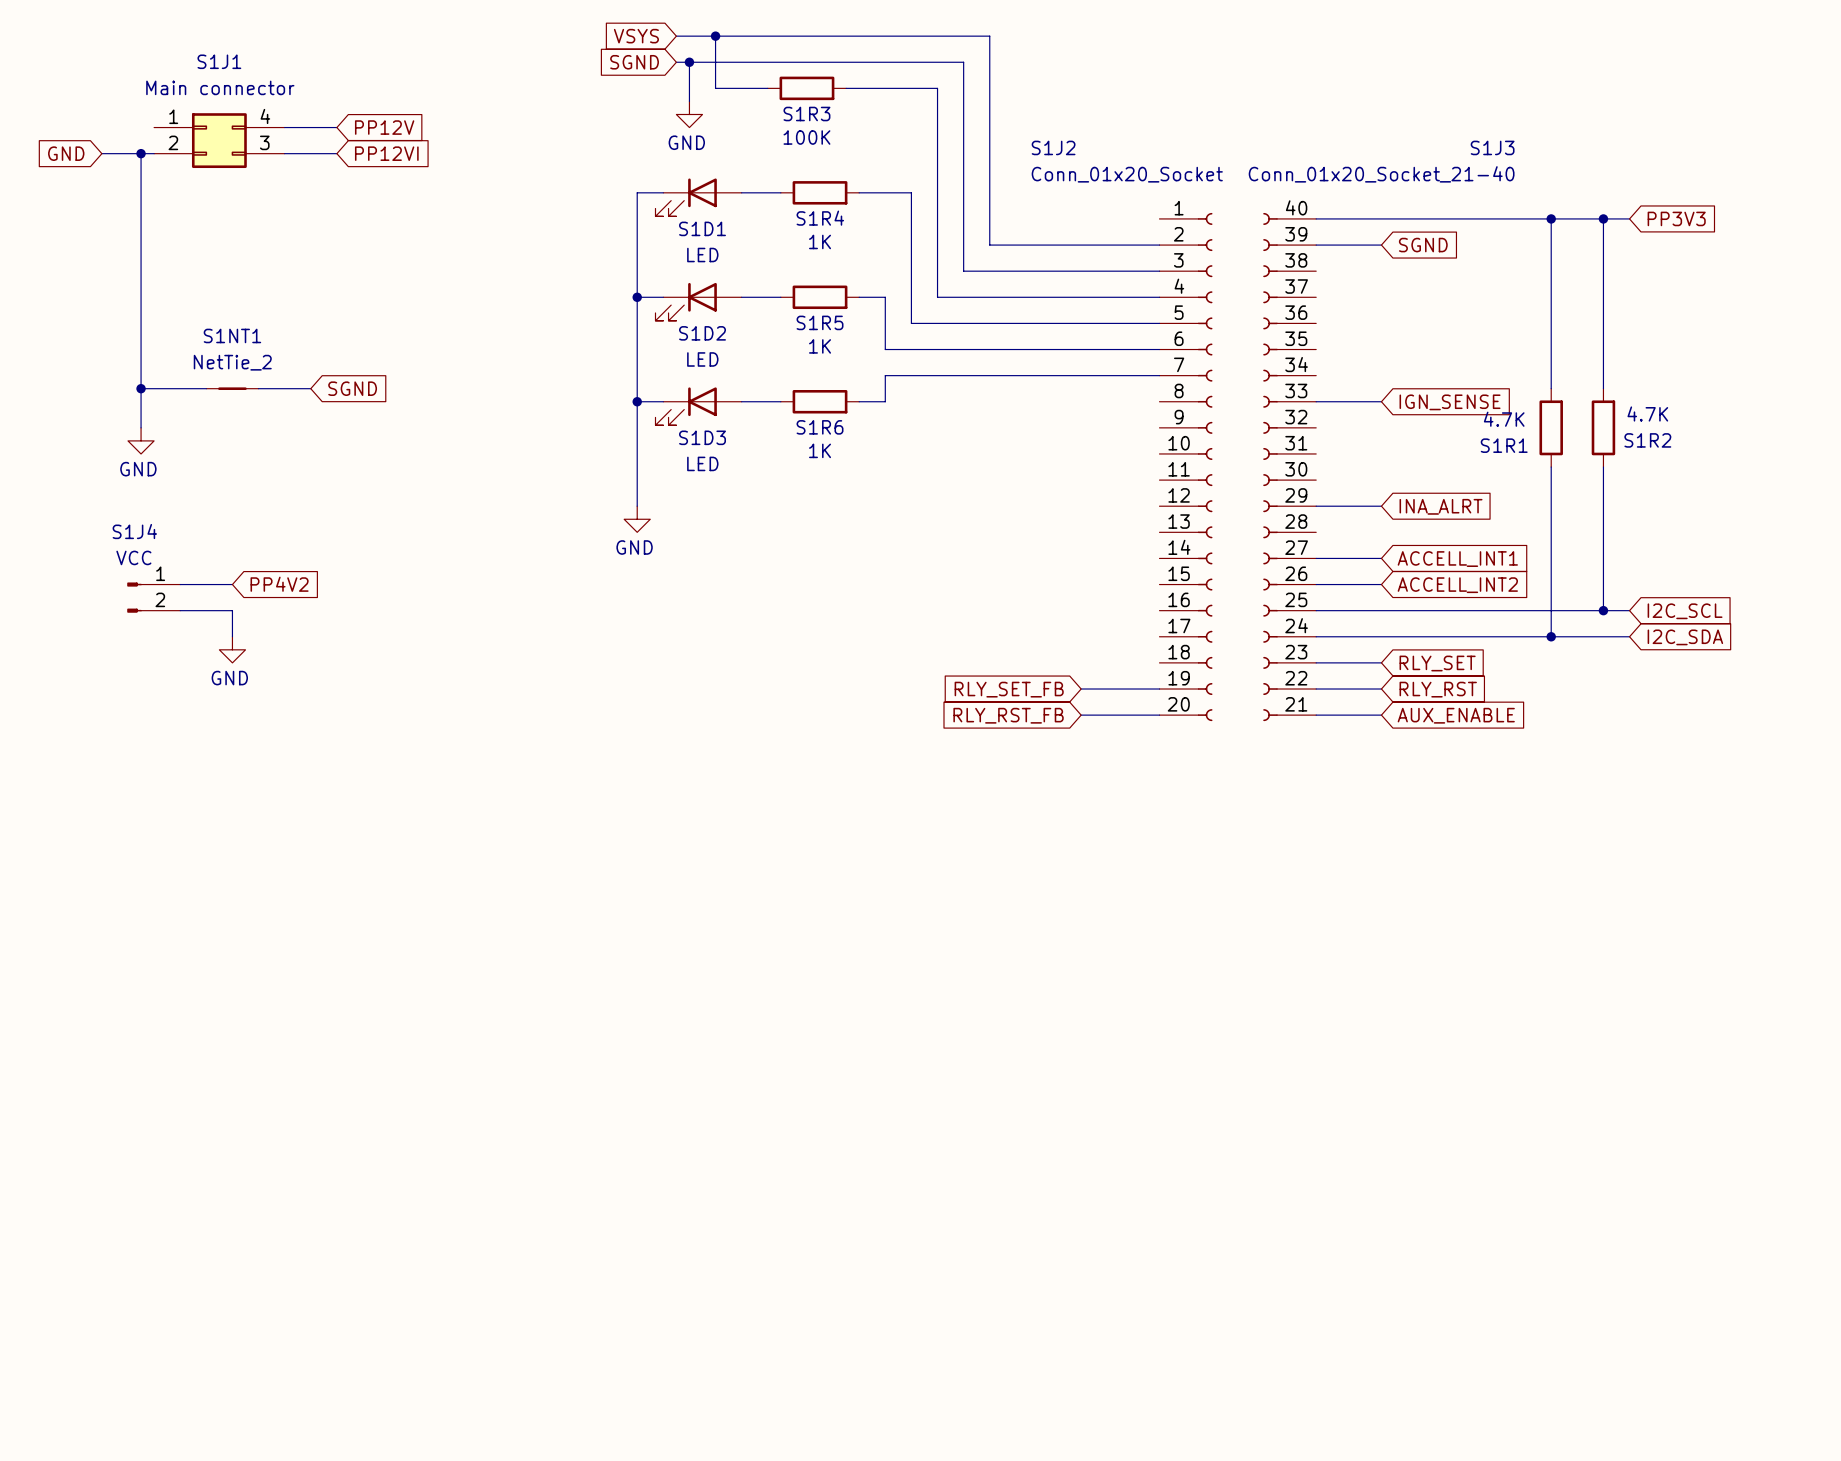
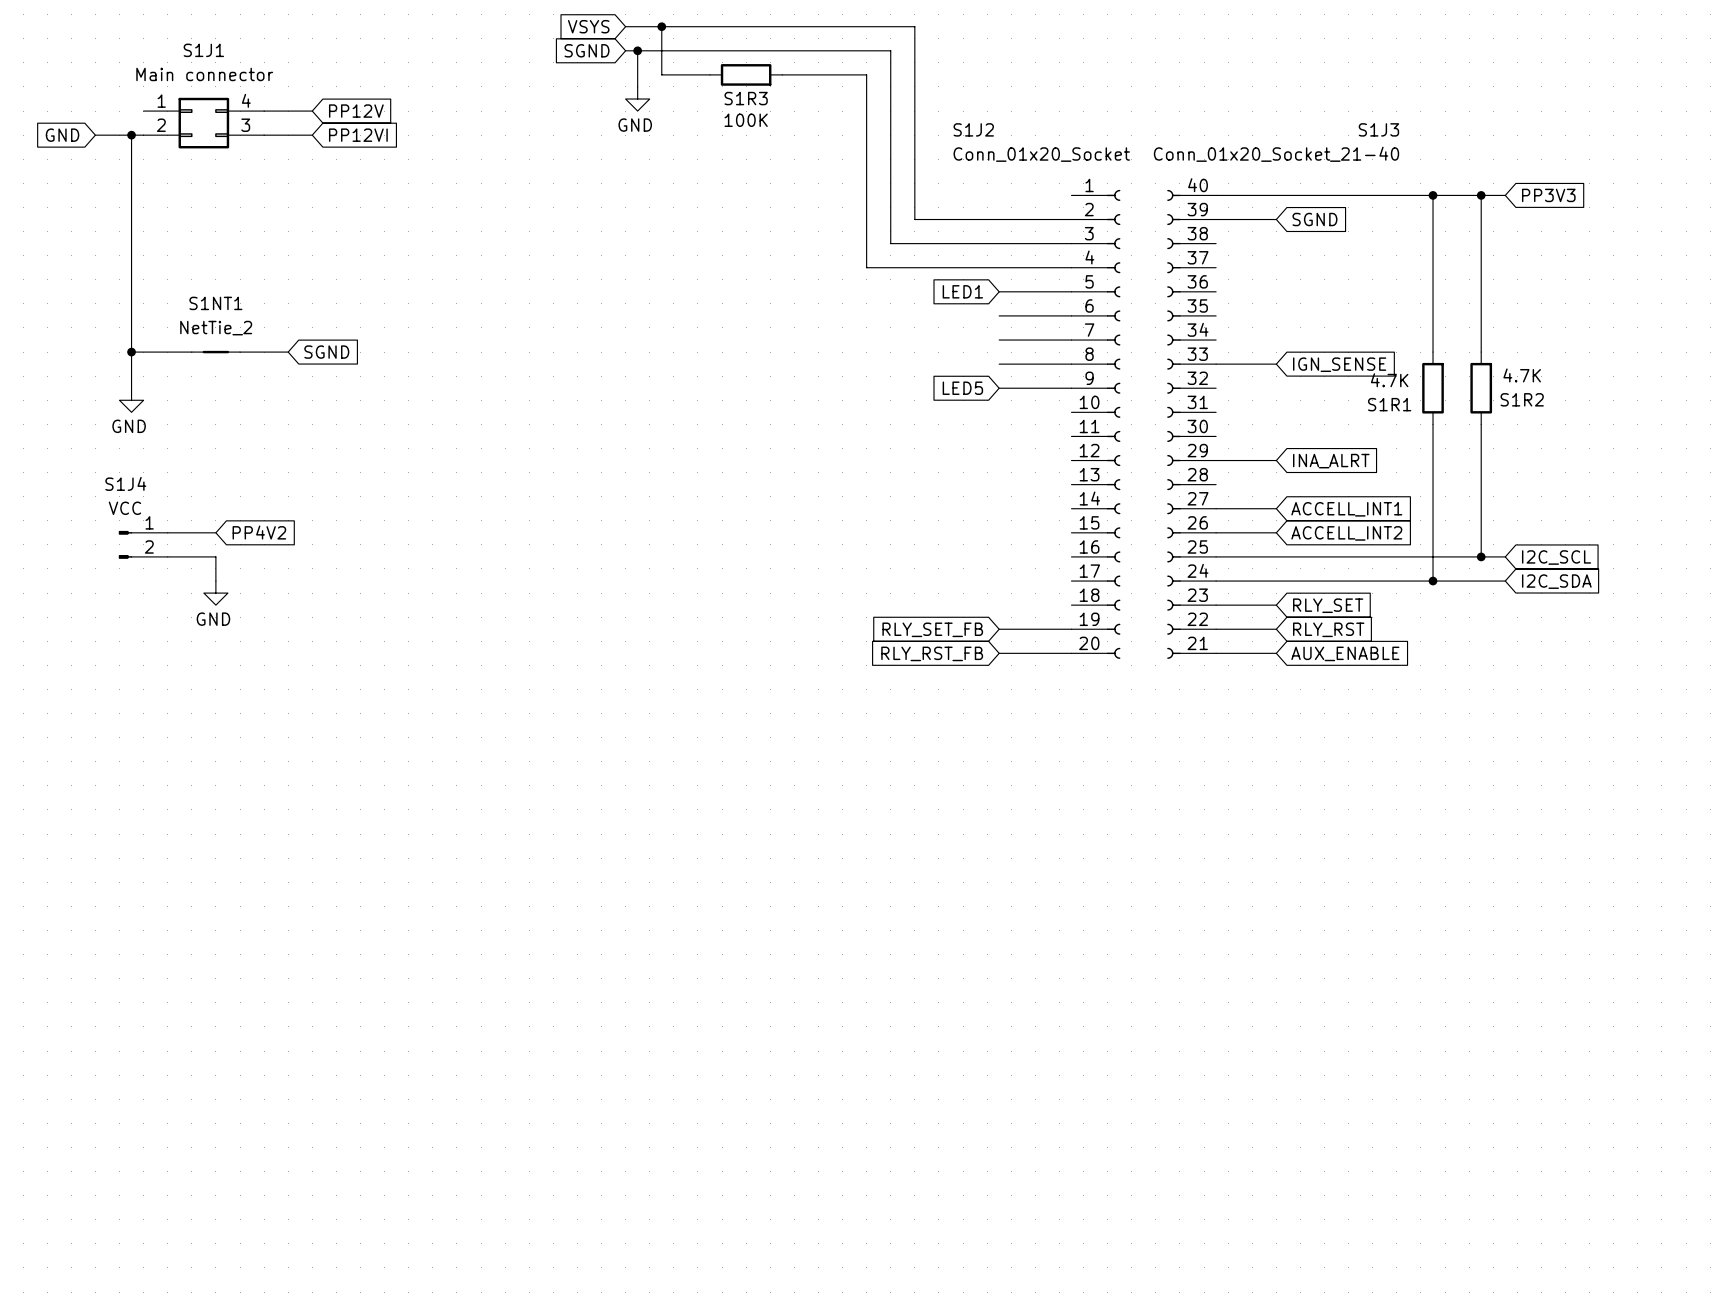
wire: (663, 192) (637, 192) (637, 506) -> none
wire: (741, 192) (780, 192) -> none
S1R4: 1K (820, 192) -> none
wire: (859, 192) (911, 192) (911, 323) (1081, 323) -> none
S1D1: LED (698, 197) -> none
wire: (637, 297) (663, 297) -> none
junction: (637, 297) -> none
wire: (741, 297) (780, 297) -> none
S1R5: 1K (820, 297) -> none
wire: (859, 297) (885, 297) (885, 349) (1081, 349) -> none
S1D2: LED (698, 301) -> none
global label: none -> LED1 (962, 291)
wire: (1081, 375) (885, 375) (885, 401) (859, 401) -> none
wire: (637, 401) (663, 401) -> none
junction: (637, 401) -> none
wire: (741, 401) (780, 401) -> none
S1R6: 1K (820, 401) -> none
wire: none -> (999, 364) (1071, 364)
S1D3: LED (698, 406) -> none
global label: none -> LED5 (962, 388)
wire: none -> (999, 388) (1071, 388)
power symbol: GND (637, 519) -> none

